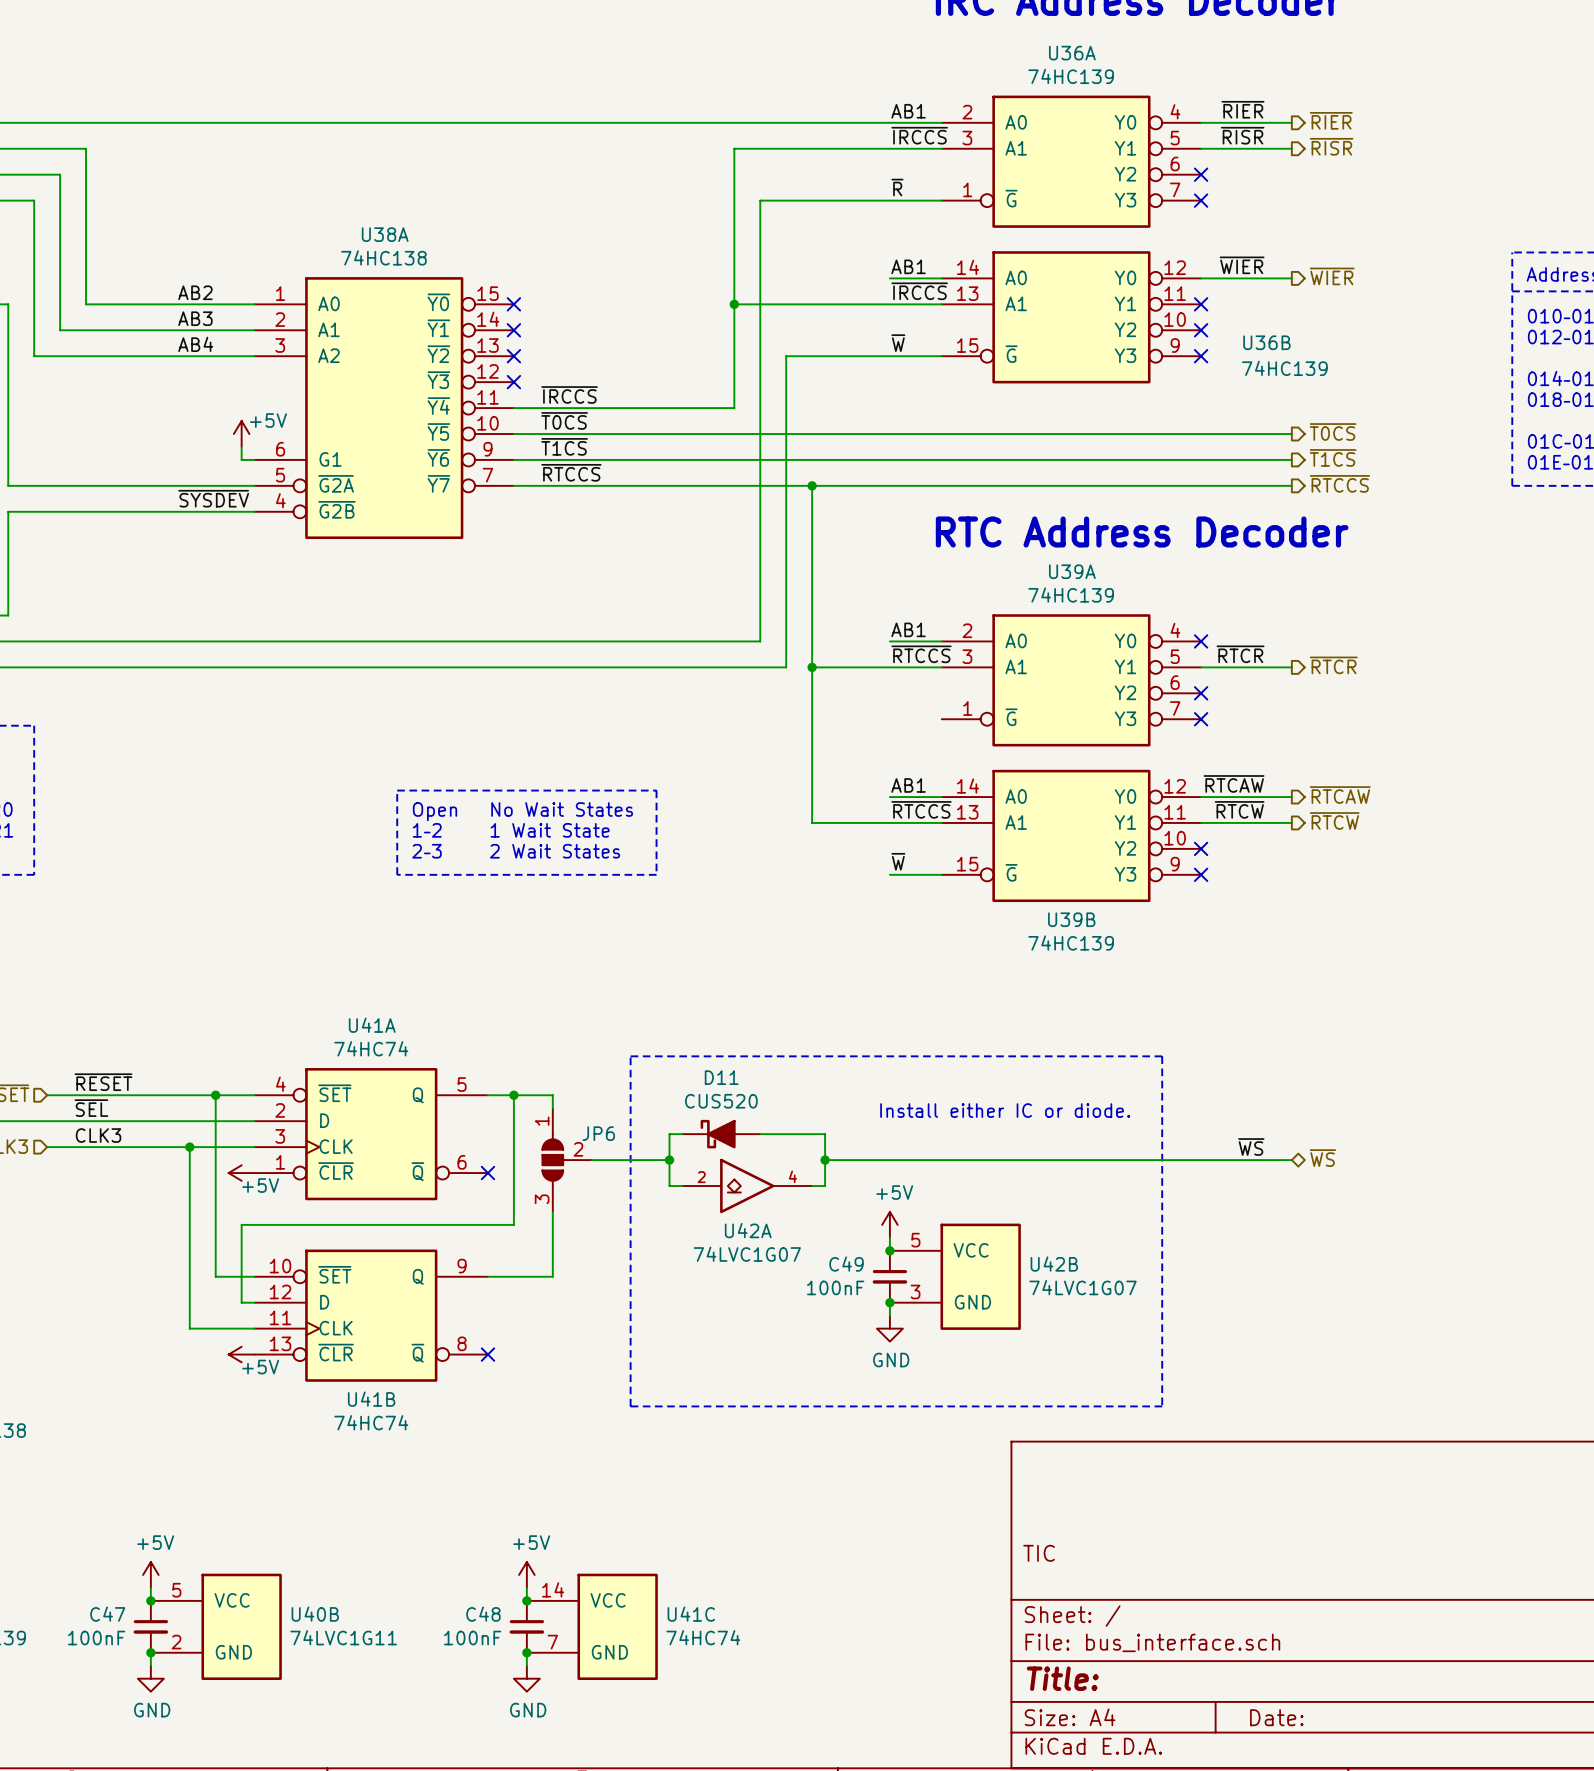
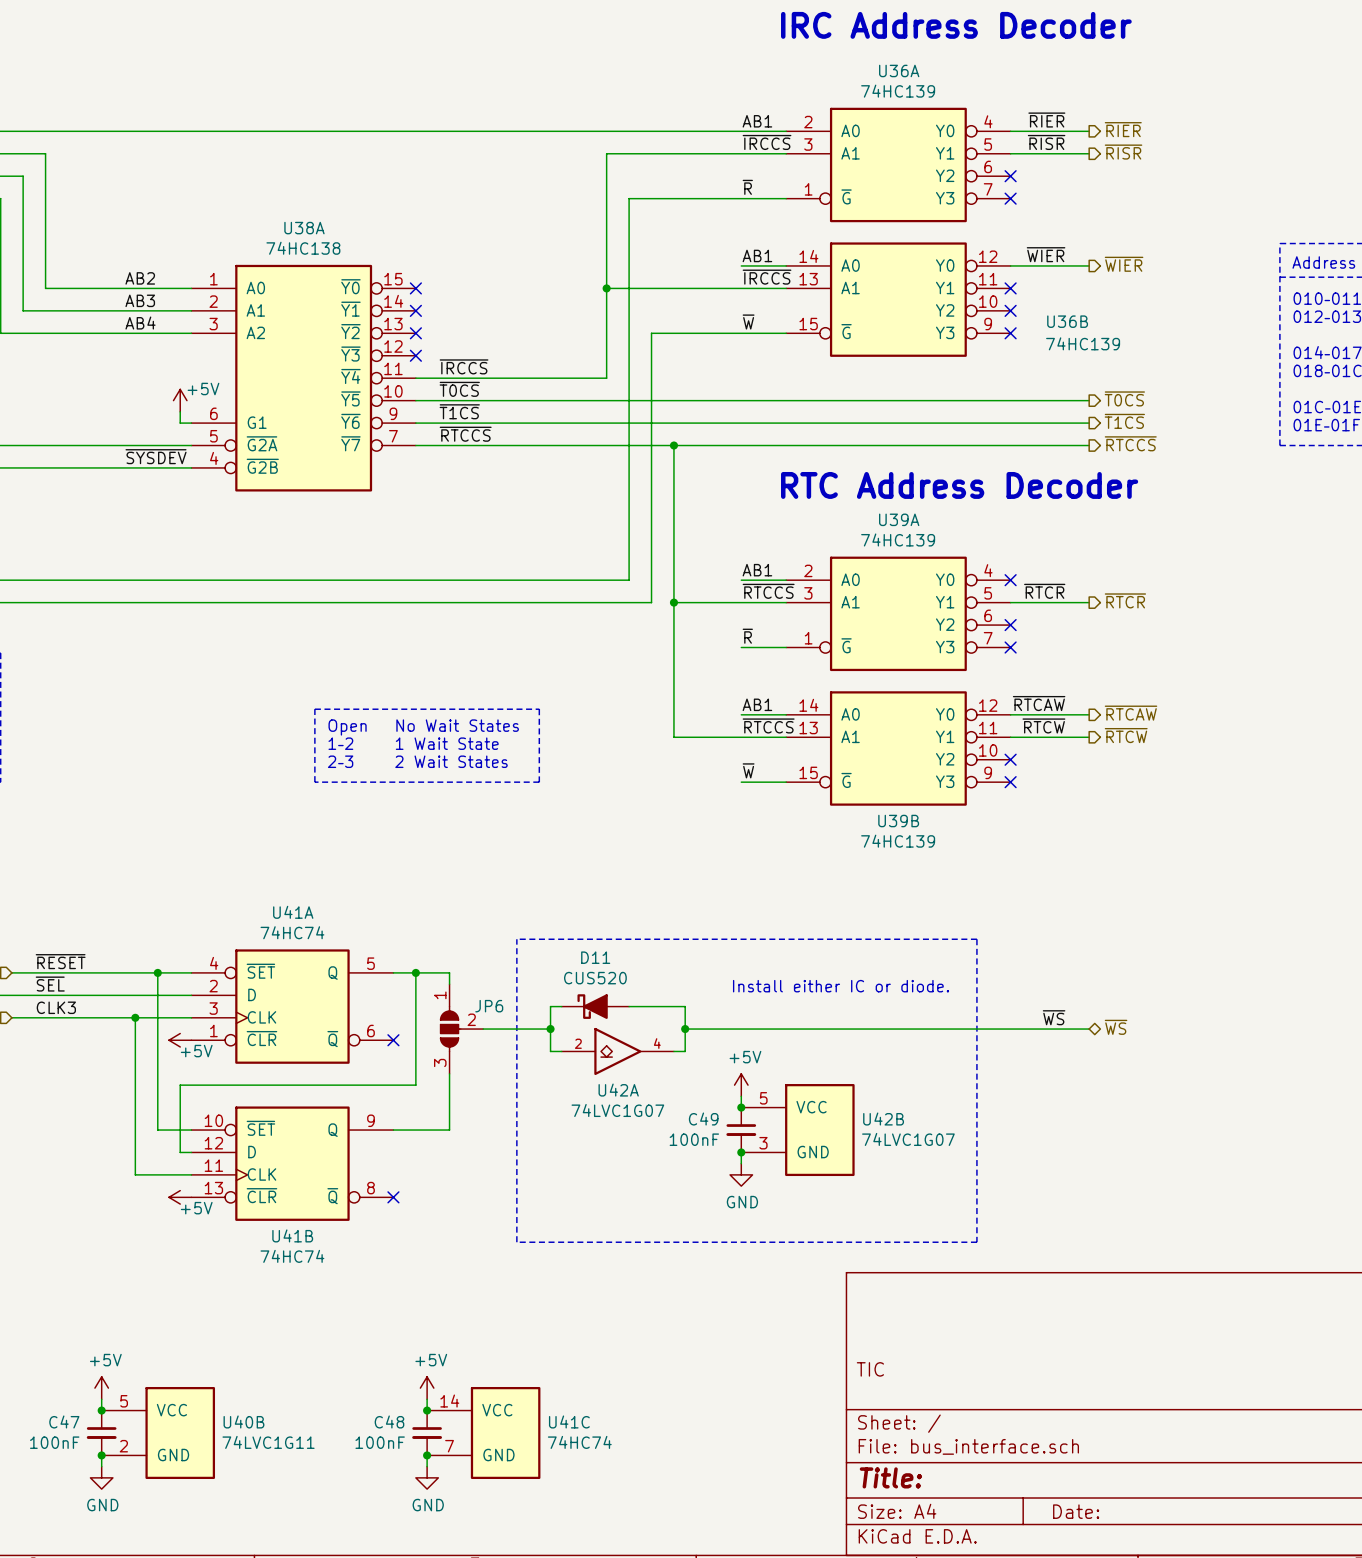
label: none -> ~{R} (747, 636)
wire: none -> (741, 647) (786, 647)

